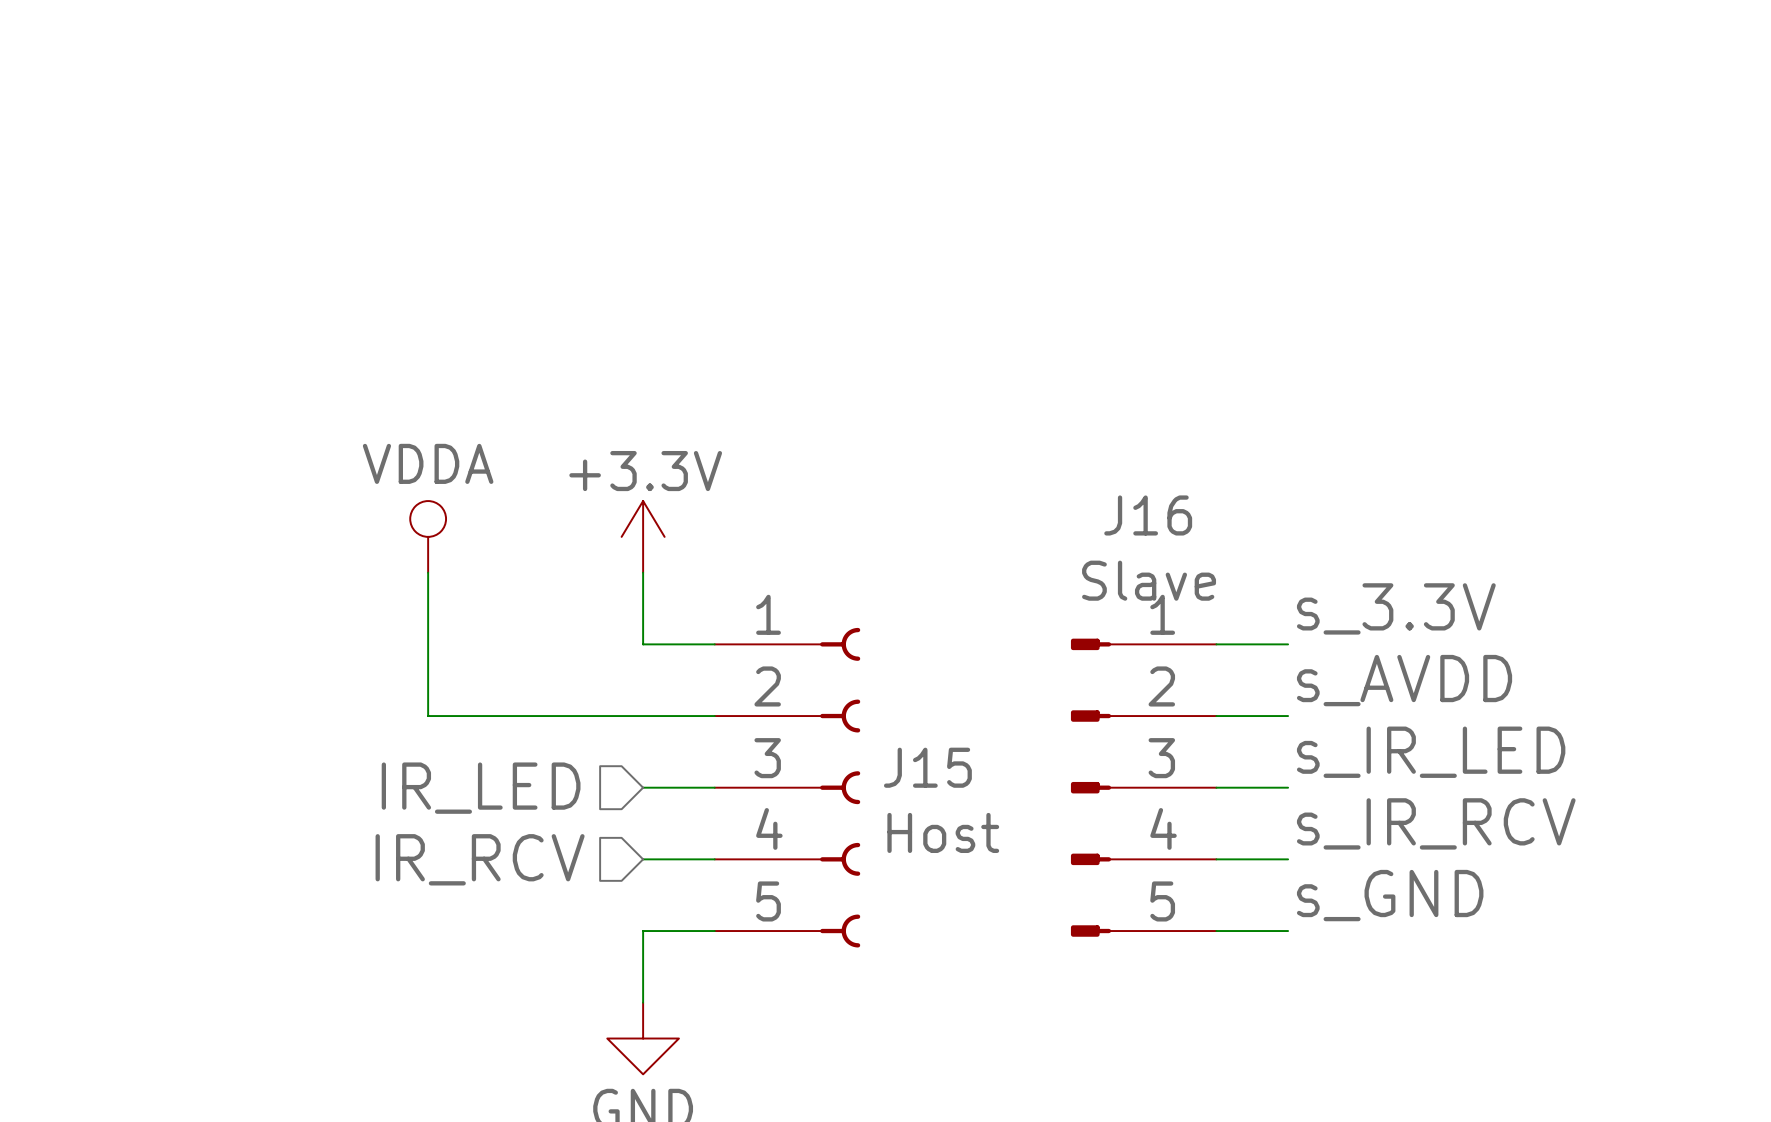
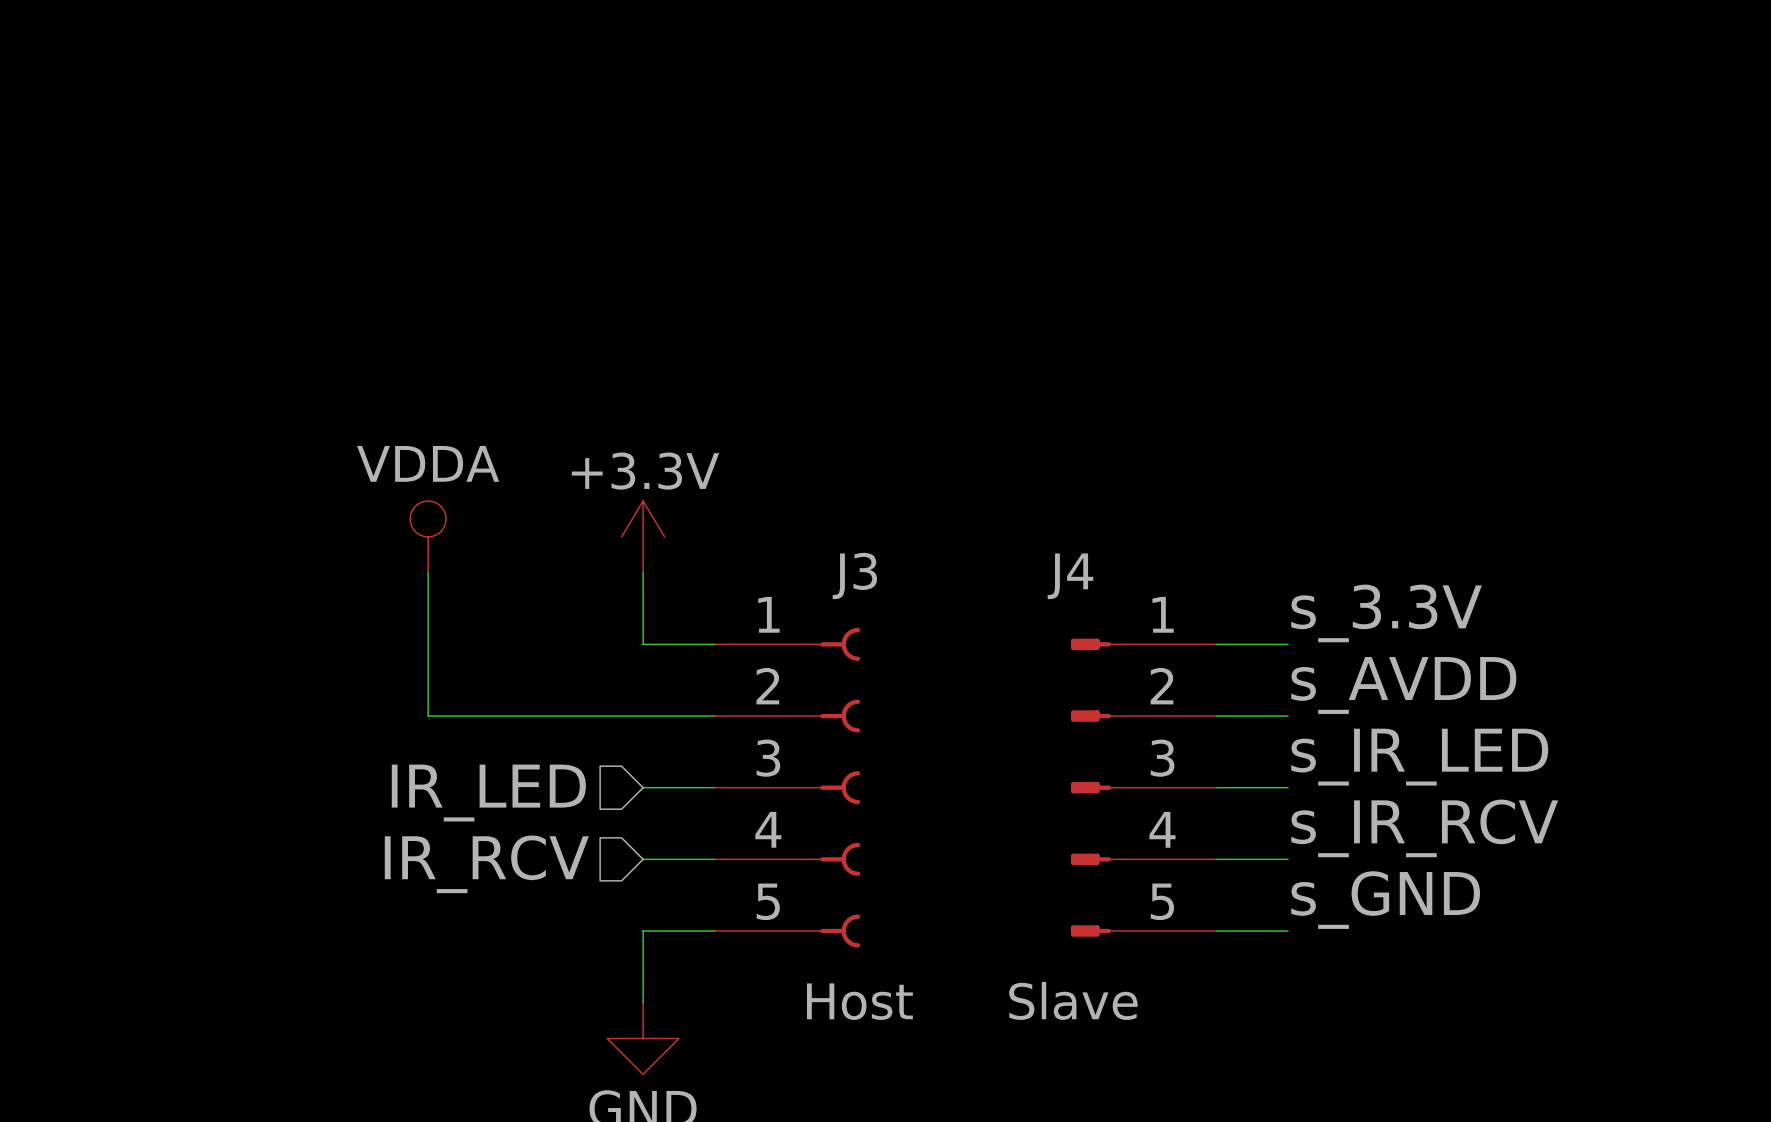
J16 name: J16 (1148, 515) -> J4 (1070, 576)
J16 value position: Slave (1149, 580) -> Slave (1073, 1000)
J15 name: J15 (927, 767) -> J3 (854, 575)
J15 value position: Host (943, 832) -> Host (859, 1001)

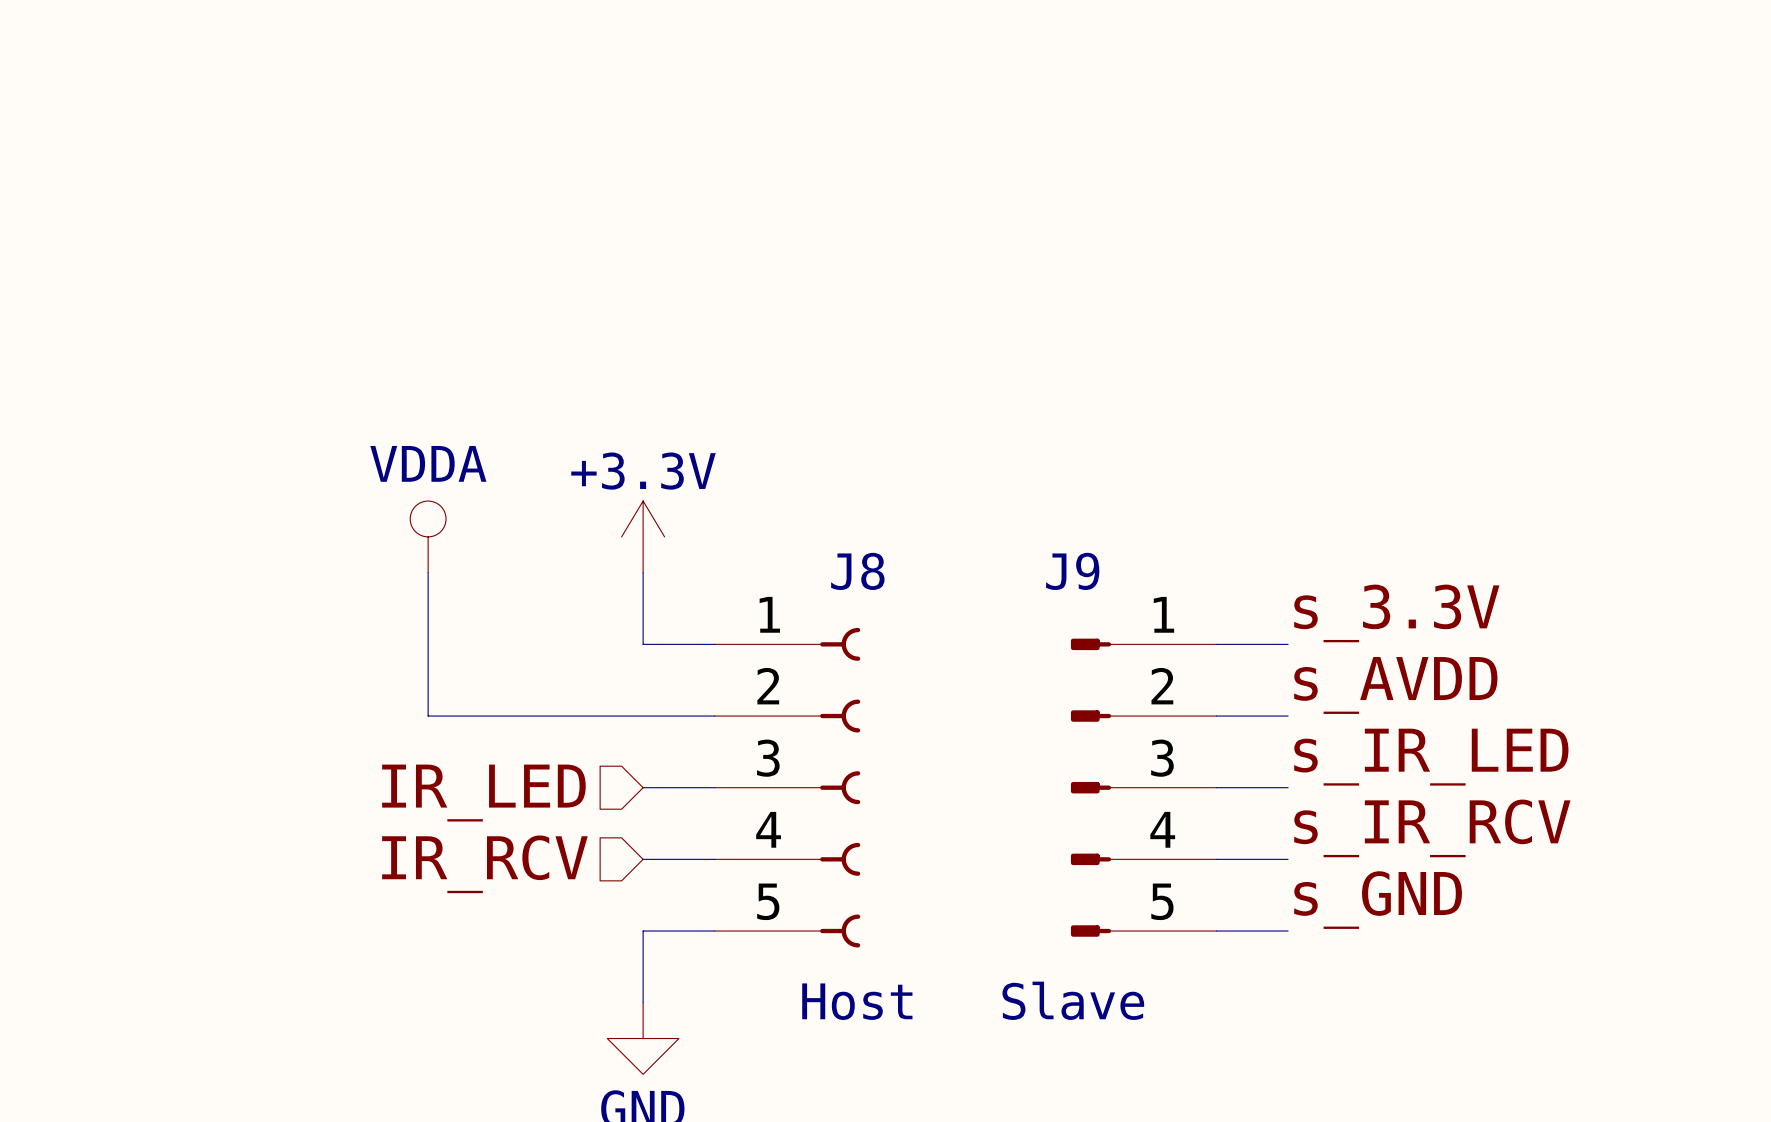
J3 name: J3 (854, 575) -> J8 (857, 571)
J4 name: J4 (1070, 576) -> J9 (1072, 571)

